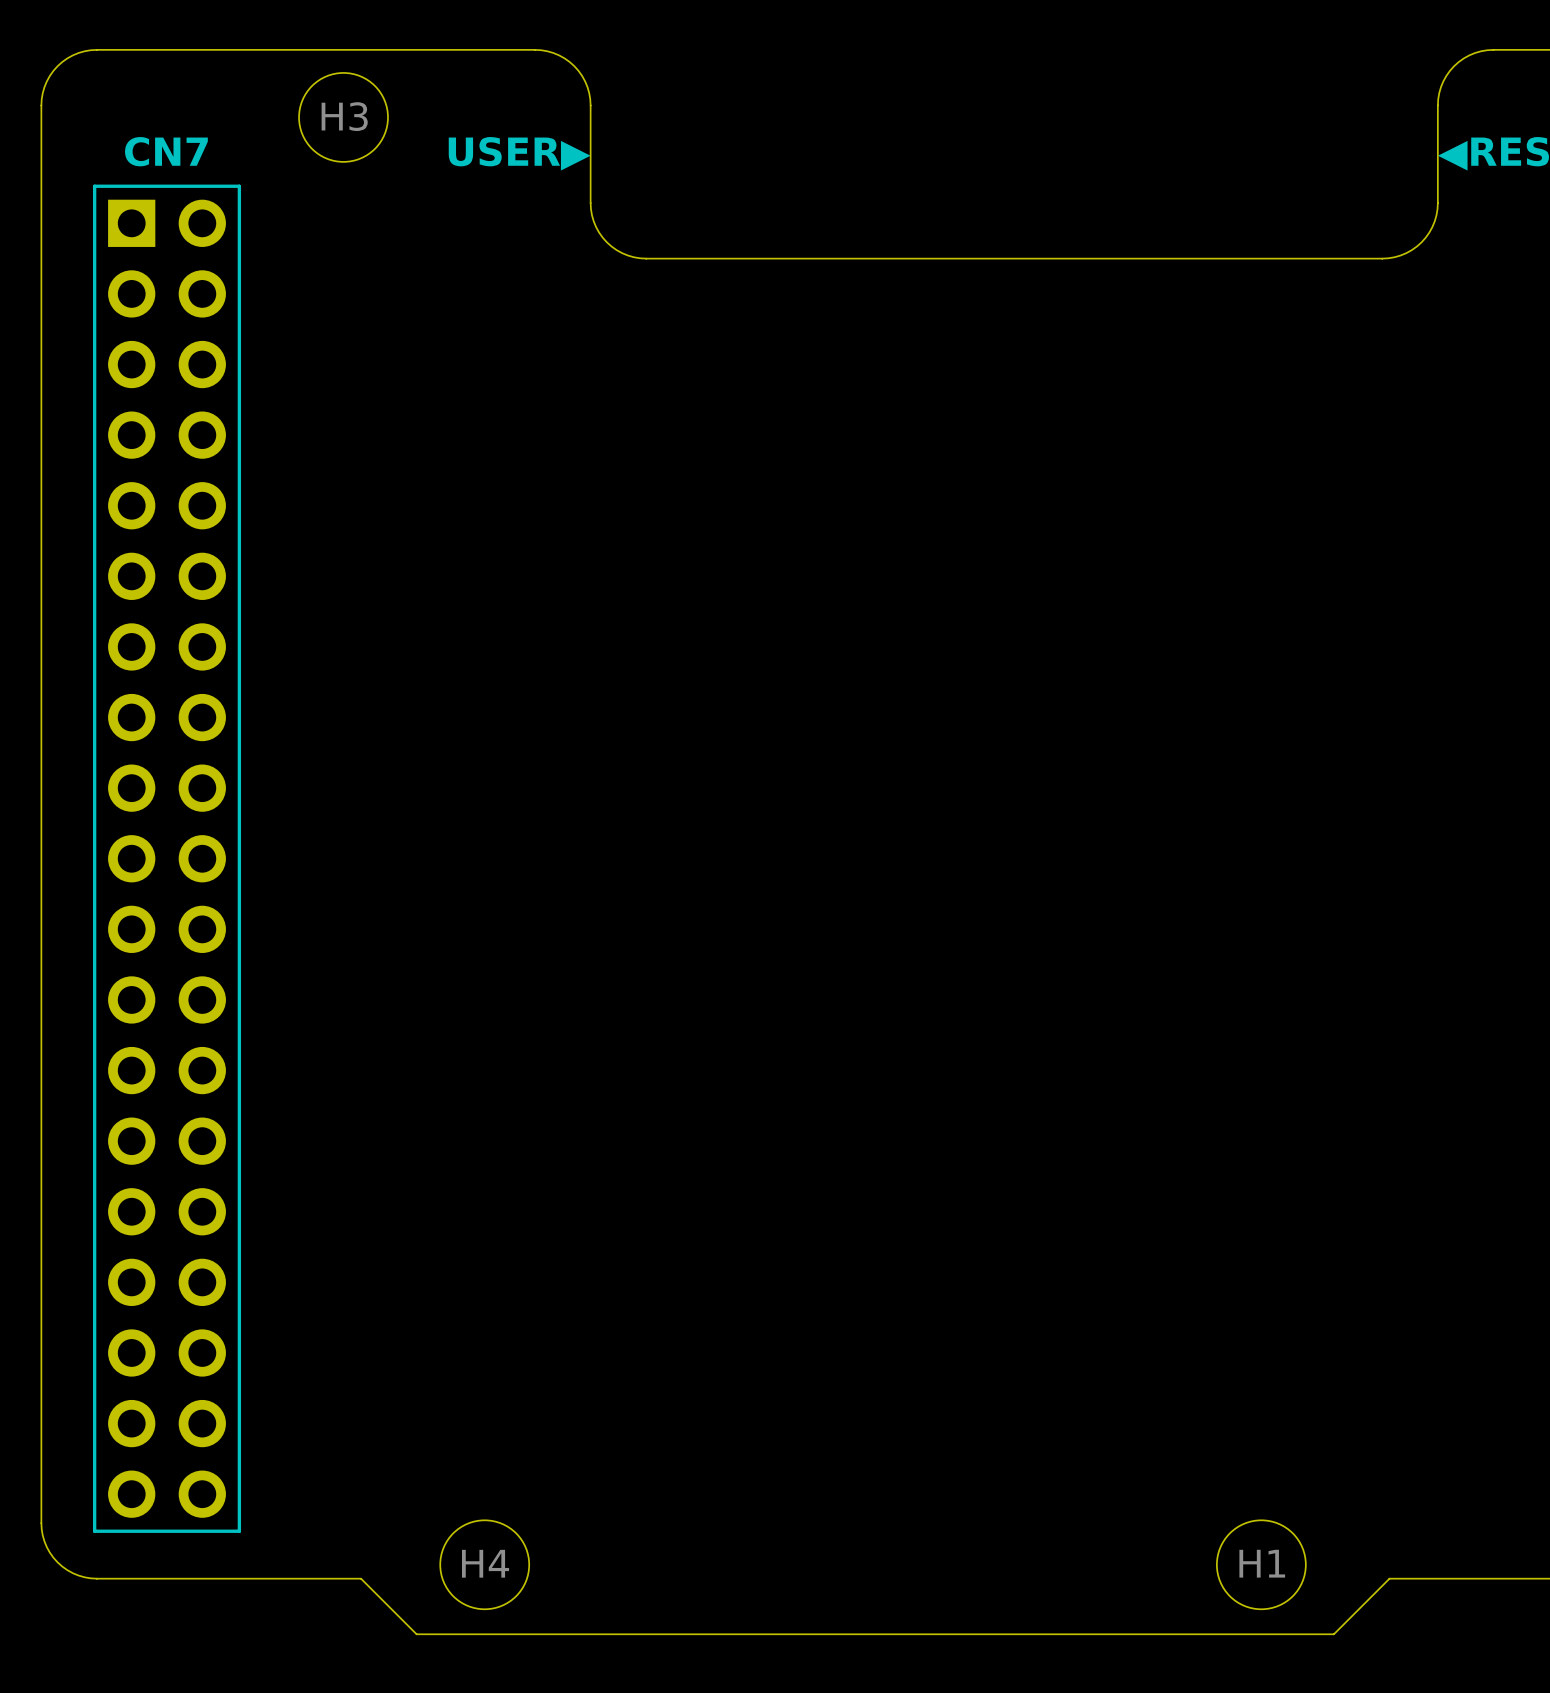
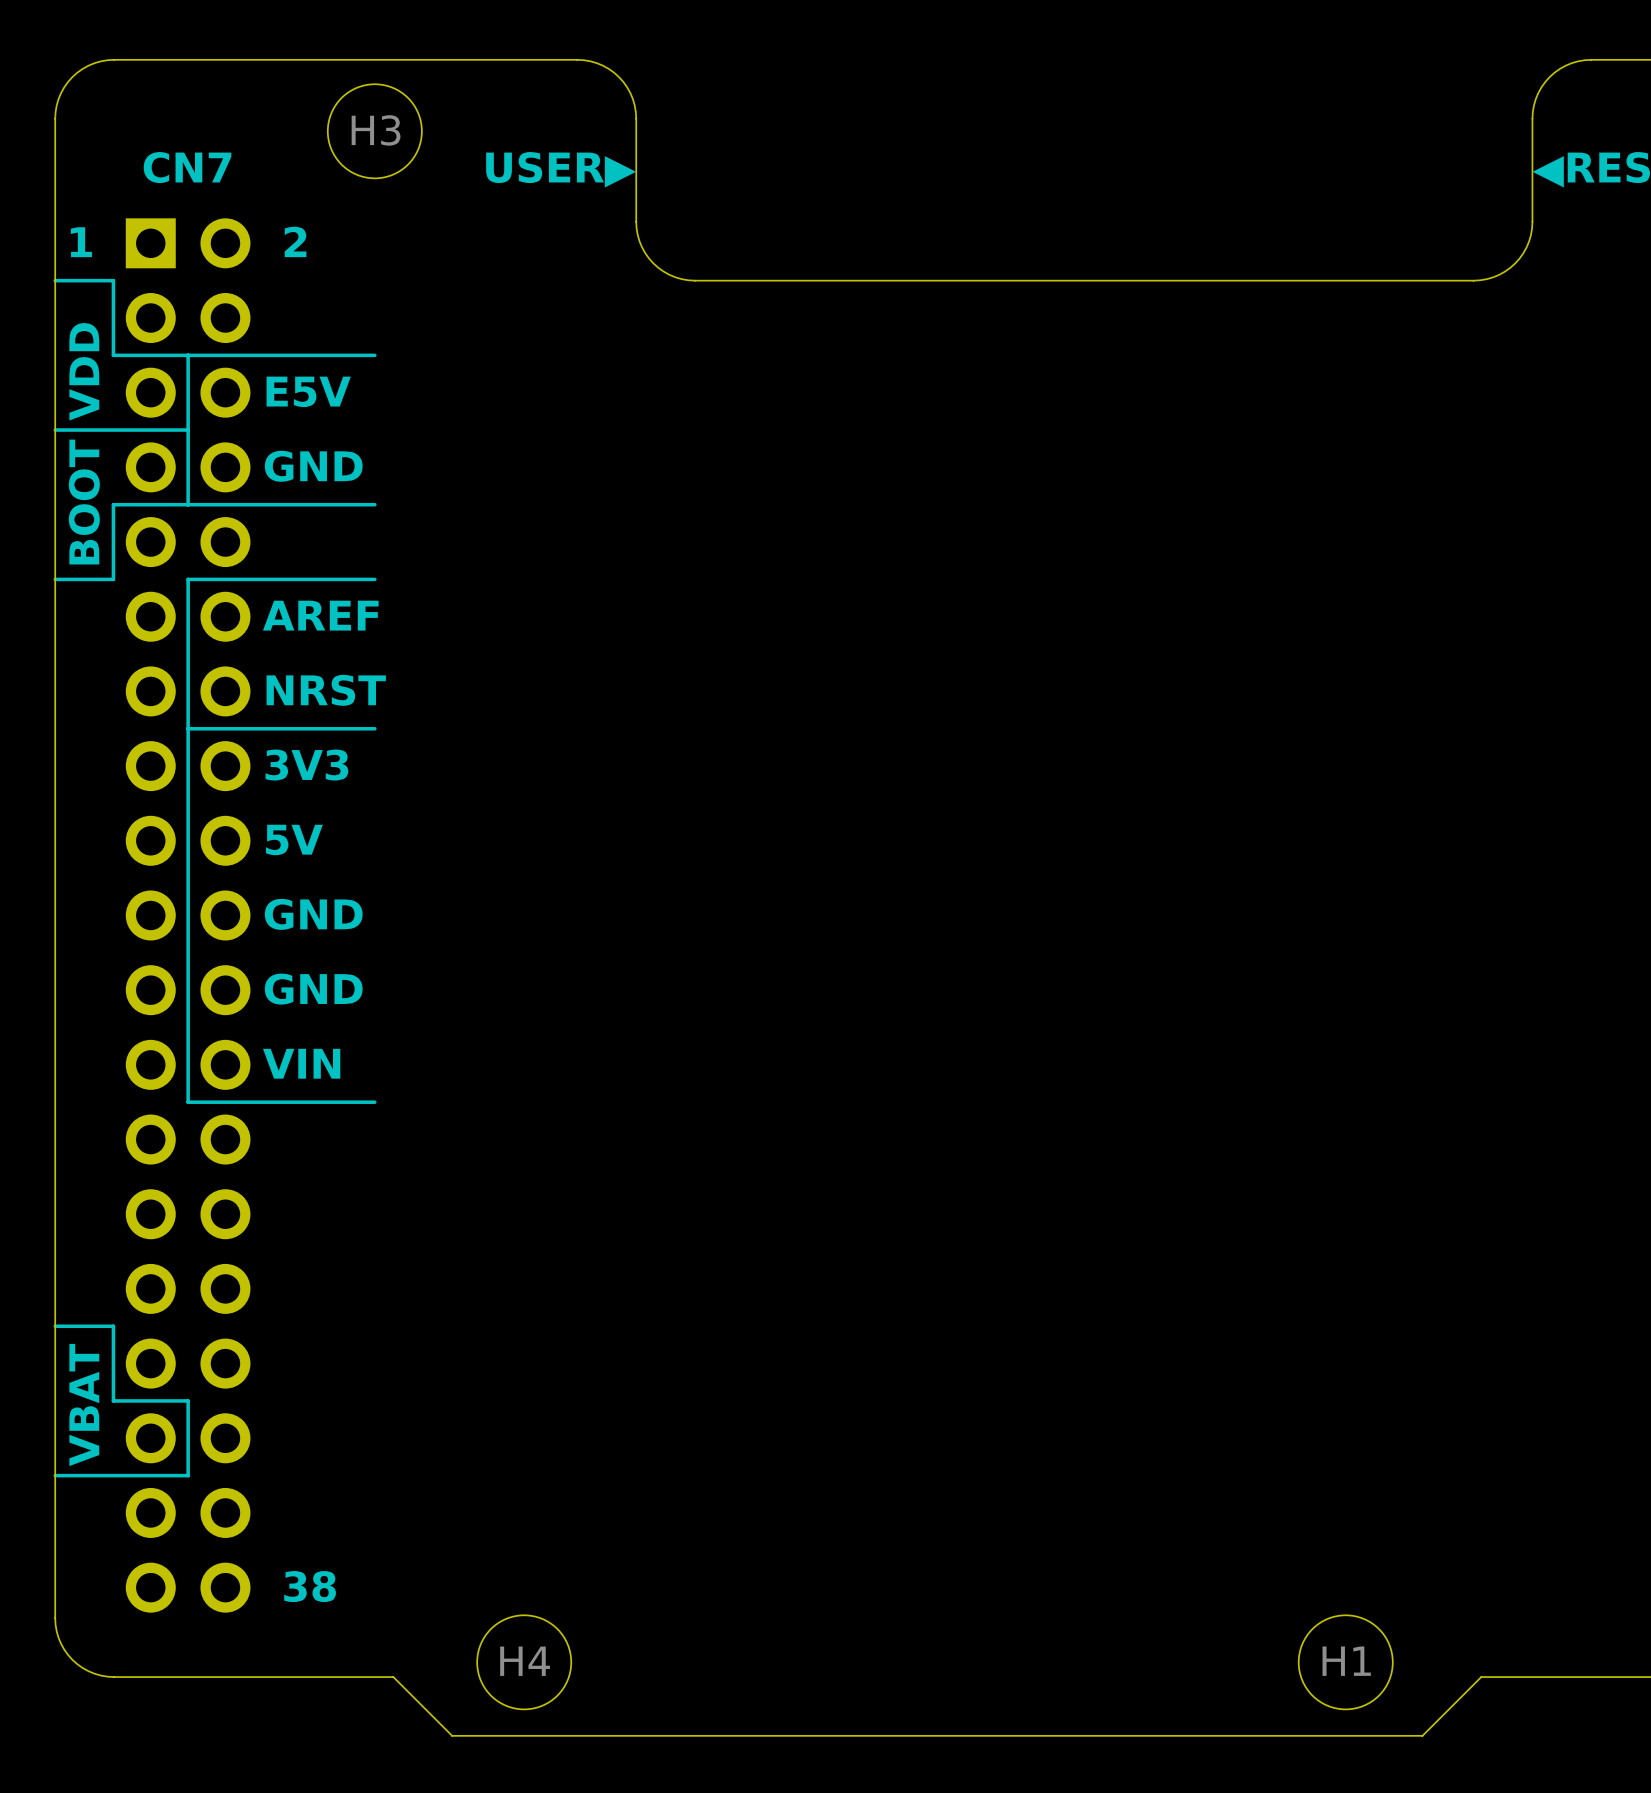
line: (94, 186) (94, 1531) (239, 1531) (239, 186) (94, 186) -> none
text: none -> 1 (81, 242)
text: none -> 2 (295, 241)
line: none -> (55, 280) (113, 280) (113, 355) (374, 355)
line: none -> (188, 355) (188, 504)
text: none -> VDD (84, 371)
text: none -> E5V (308, 391)
line: none -> (55, 430) (188, 430)
text: none -> GND (313, 466)
text: none -> BOOT (84, 502)
line: none -> (374, 504) (113, 504) (113, 579) (55, 579)
line: none -> (374, 579) (188, 579) (188, 1102) (374, 1102)
text: none -> AREF (320, 615)
text: none -> NRST (326, 690)
line: none -> (188, 728) (374, 728)
text: none -> 3V3 (306, 765)
text: none -> 5V (294, 839)
text: none -> GND (313, 914)
text: none -> GND (313, 989)
text: none -> VIN (301, 1063)
line: none -> (55, 1326) (113, 1326) (113, 1400) (188, 1400) (188, 1475) (55, 1475)
text: none -> VBAT (84, 1405)
text: none -> 38 (310, 1586)

